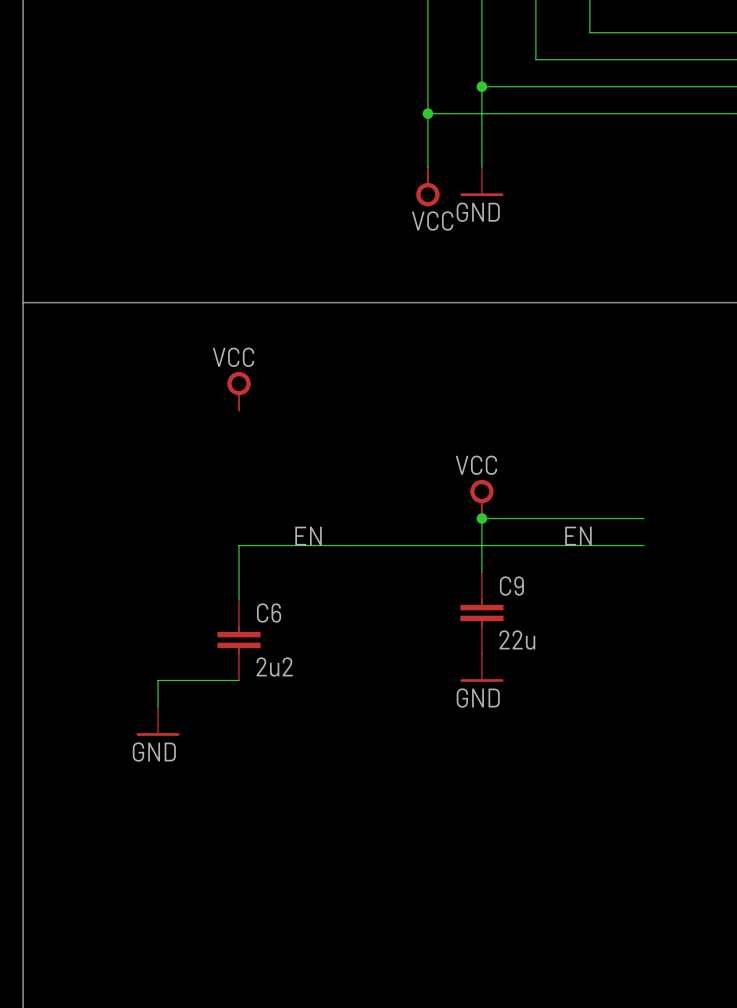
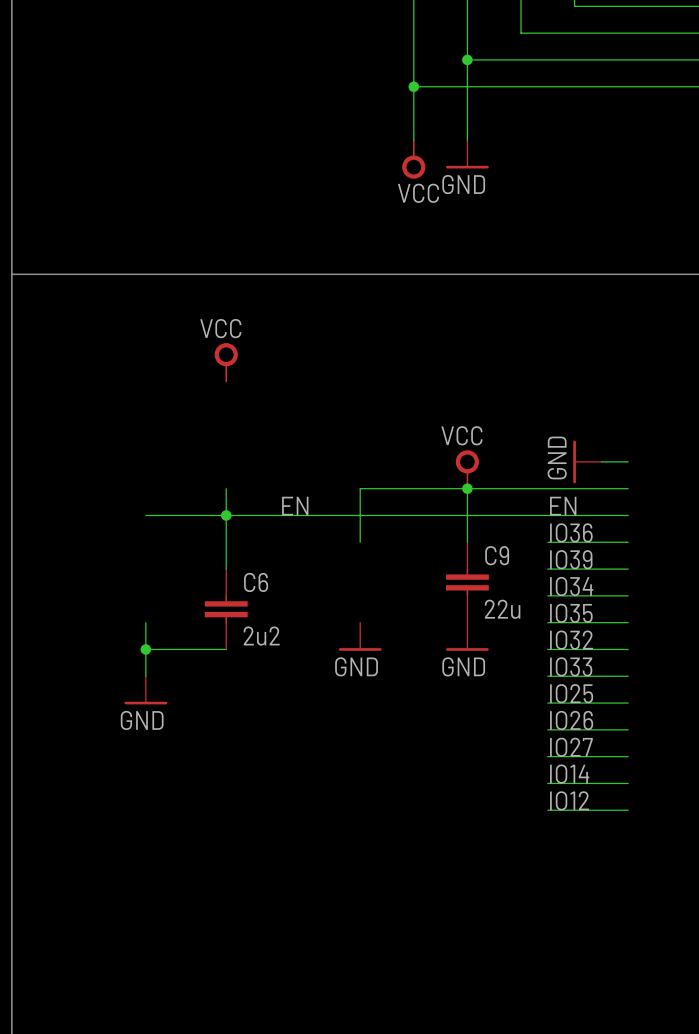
power symbol: none -> GND (587, 461)
wire: none -> (601, 461) (628, 461)
wire: none -> (226, 488) (226, 515) (145, 515)
wire: none -> (467, 488) (360, 488) (360, 542)
junction: none -> (226, 515)
label: none -> IO36 (571, 532)
wire: none -> (547, 542) (628, 542)
label: none -> IO39 (571, 559)
wire: none -> (547, 569) (628, 569)
label: none -> IO34 (571, 586)
wire: none -> (547, 595) (628, 595)
label: none -> IO35 (571, 613)
wire: none -> (145, 622) (145, 649)
wire: none -> (547, 622) (628, 622)
power symbol: none -> GND (360, 636)
label: none -> IO32 (571, 640)
junction: none -> (145, 649)
wire: none -> (547, 649) (628, 649)
label: none -> IO33 (571, 666)
wire: none -> (547, 676) (628, 676)
label: none -> IO25 (571, 693)
wire: none -> (547, 703) (628, 703)
label: none -> IO26 (571, 720)
wire: none -> (547, 729) (628, 729)
label: none -> IO27 (571, 747)
wire: none -> (547, 756) (628, 756)
label: none -> IO14 (569, 774)
wire: none -> (547, 783) (628, 783)
label: none -> IO12 (569, 800)
wire: none -> (547, 810) (628, 810)

